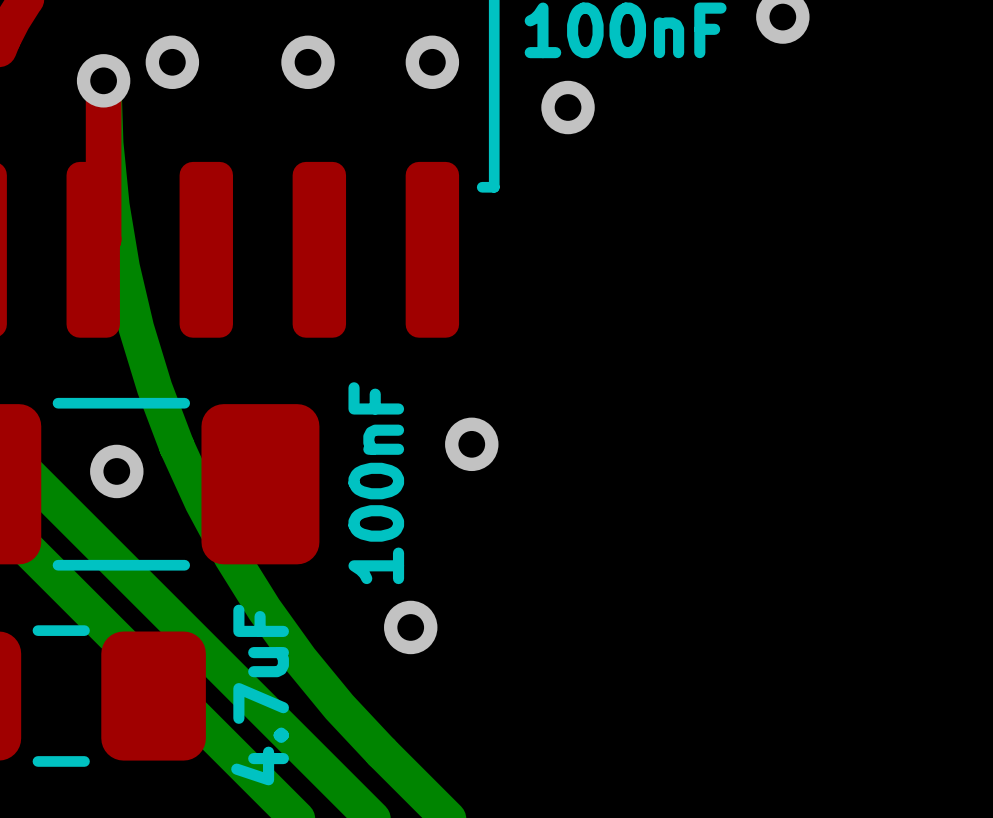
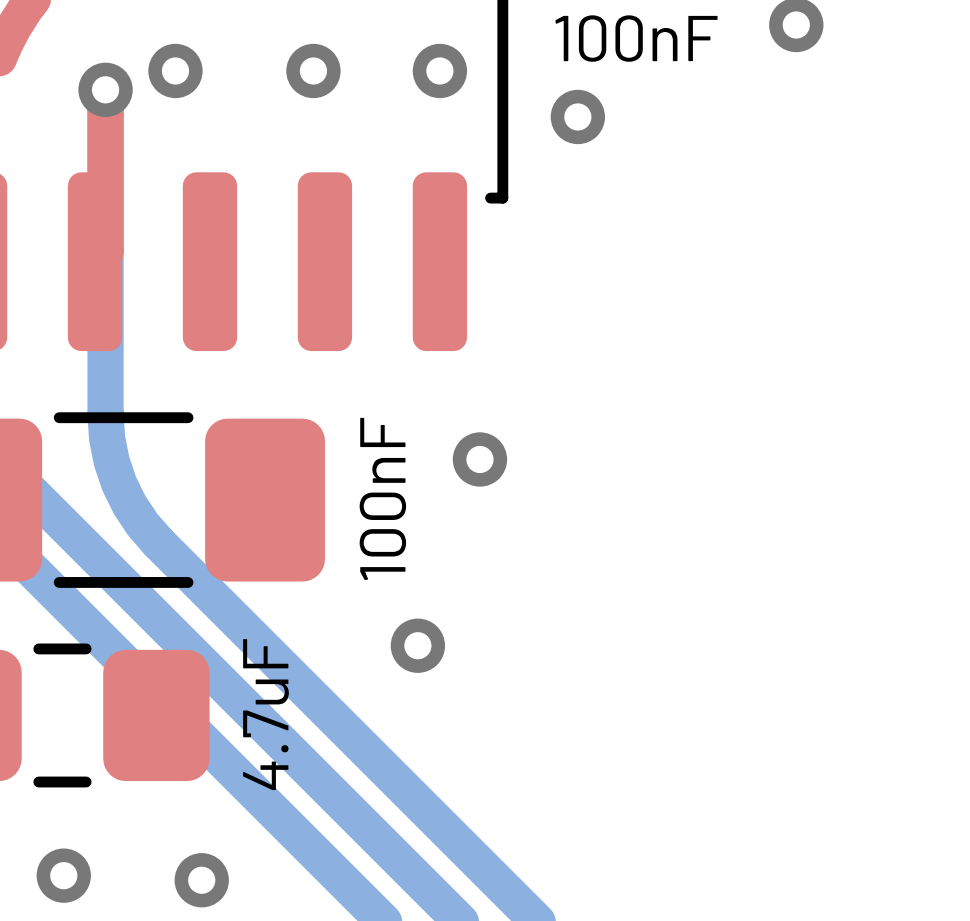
bottom track: (103, 80) (105, 143) (111, 205) (122, 267) (136, 328) (154, 387) (176, 446) (202, 502) (231, 556) (264, 609) (300, 659) (339, 707) (381, 752) -> (105, 89) (105, 414) (107, 438) (111, 461) (119, 484) (129, 505) (142, 524) (158, 542) (388, 772)
via: (116, 471) -> none

